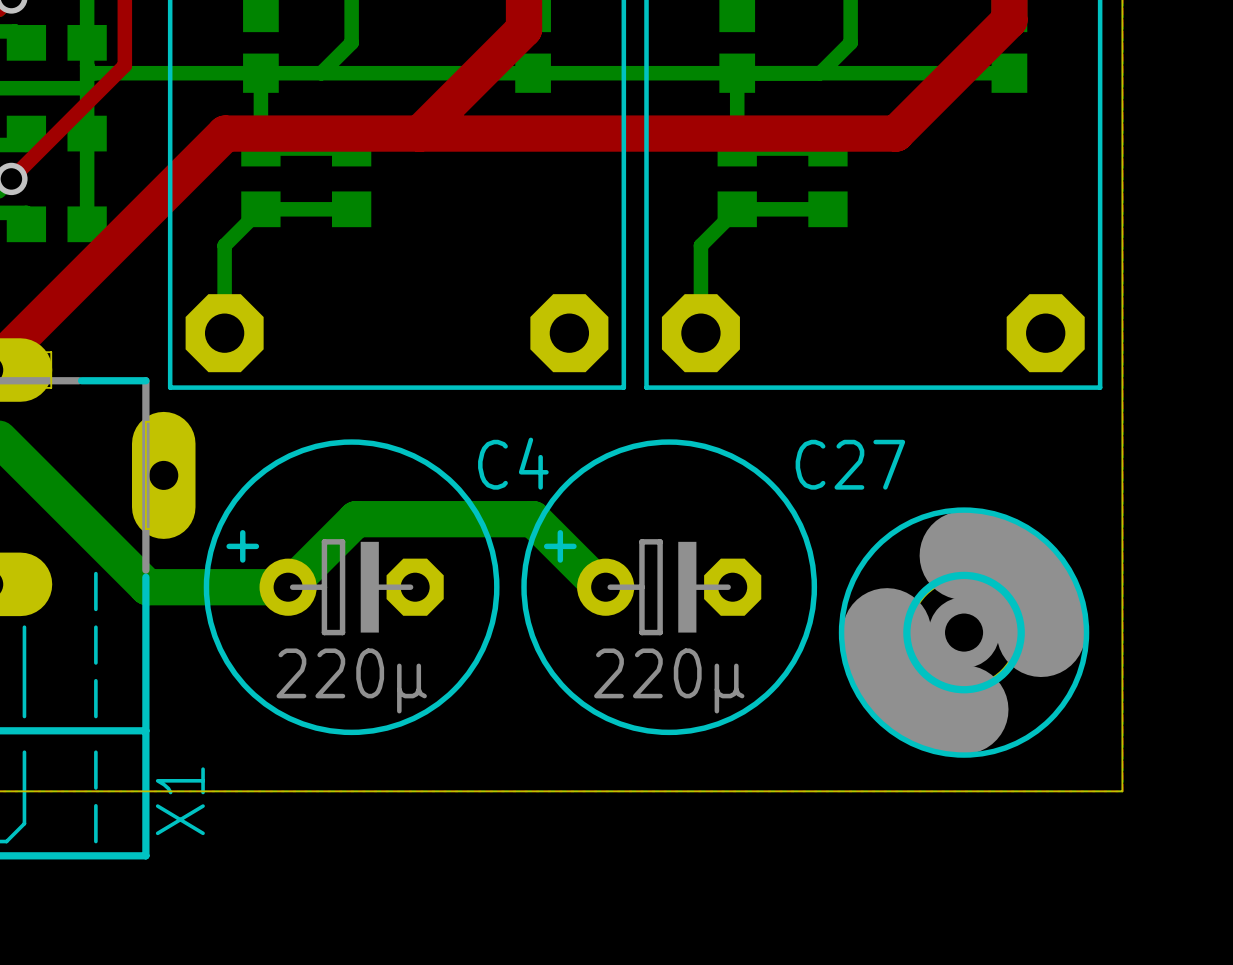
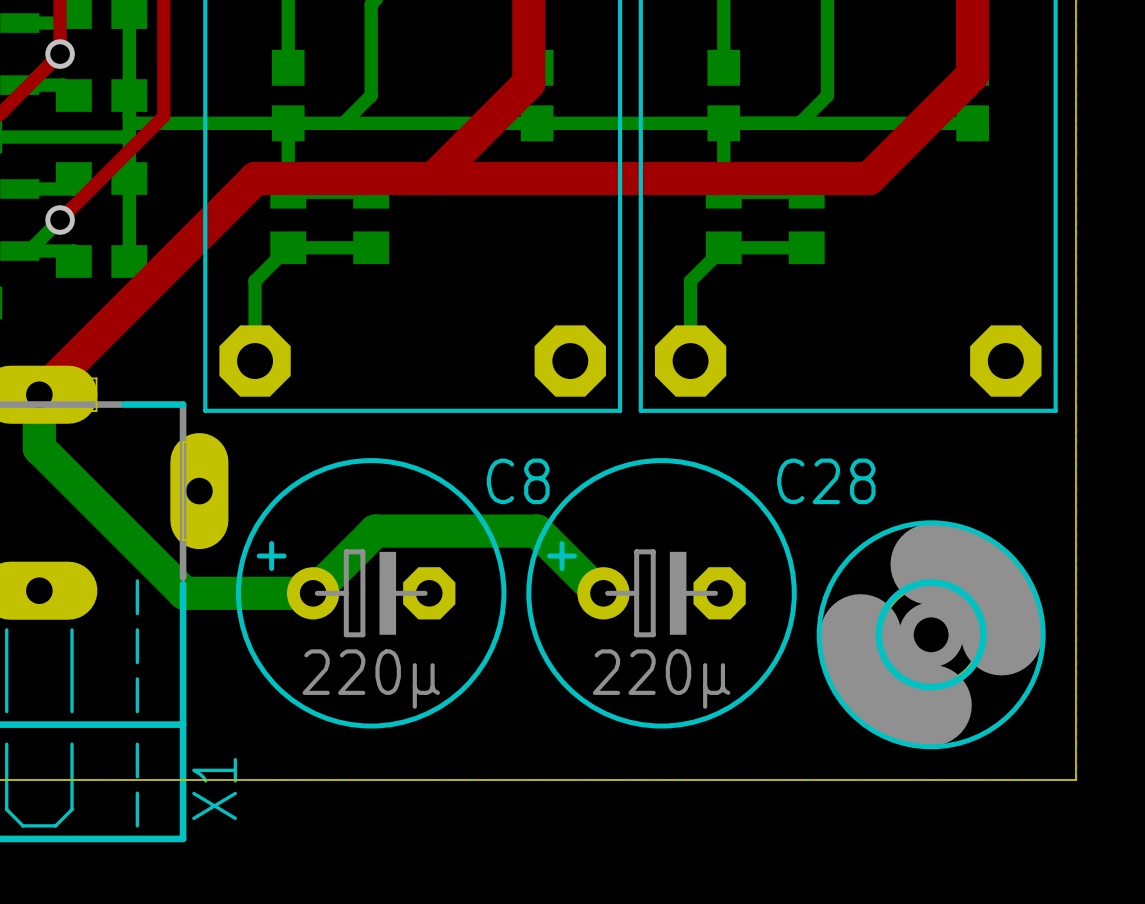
C4 name: C4 (513, 463) -> C8 (518, 481)
C27 name: C27 (850, 464) -> C28 (826, 481)

